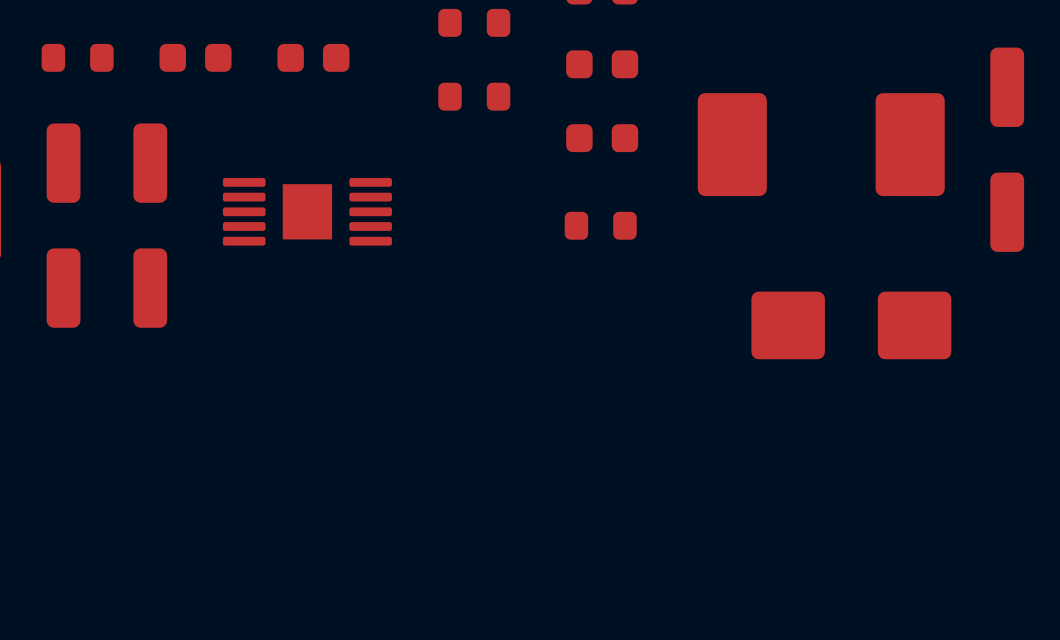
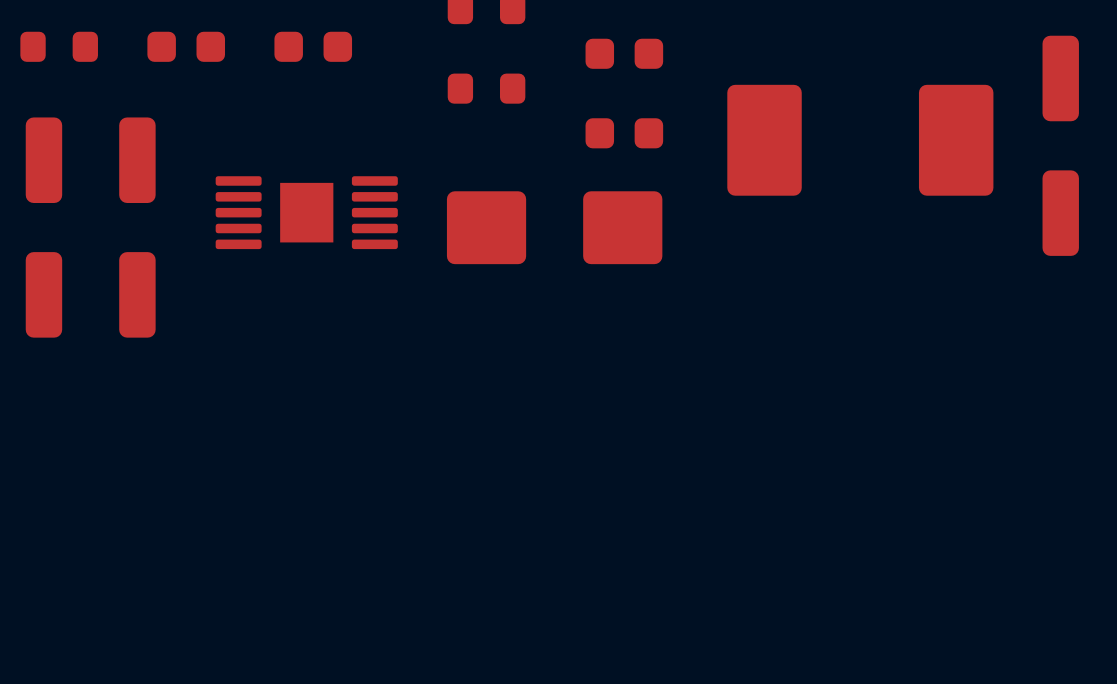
part position: (851, 325) -> (554, 227)

